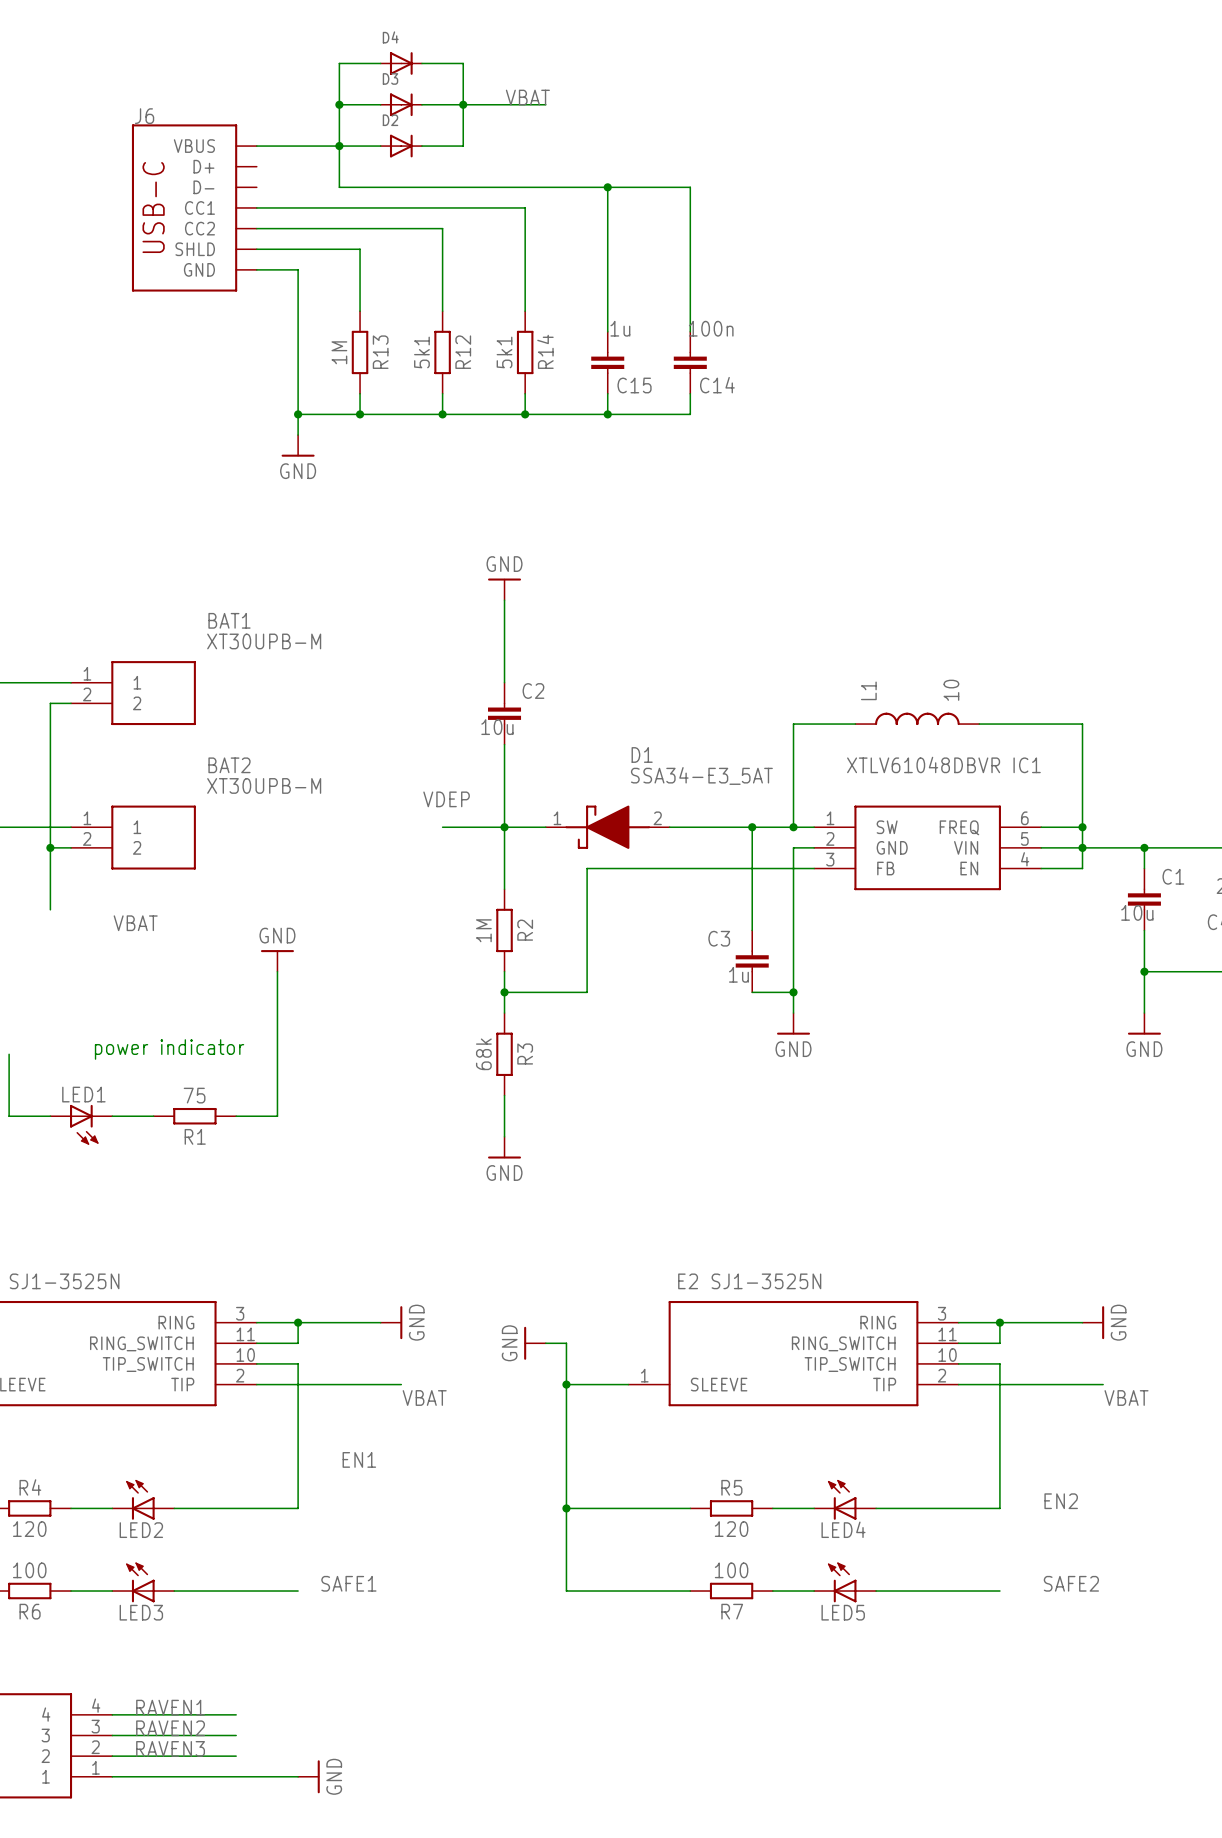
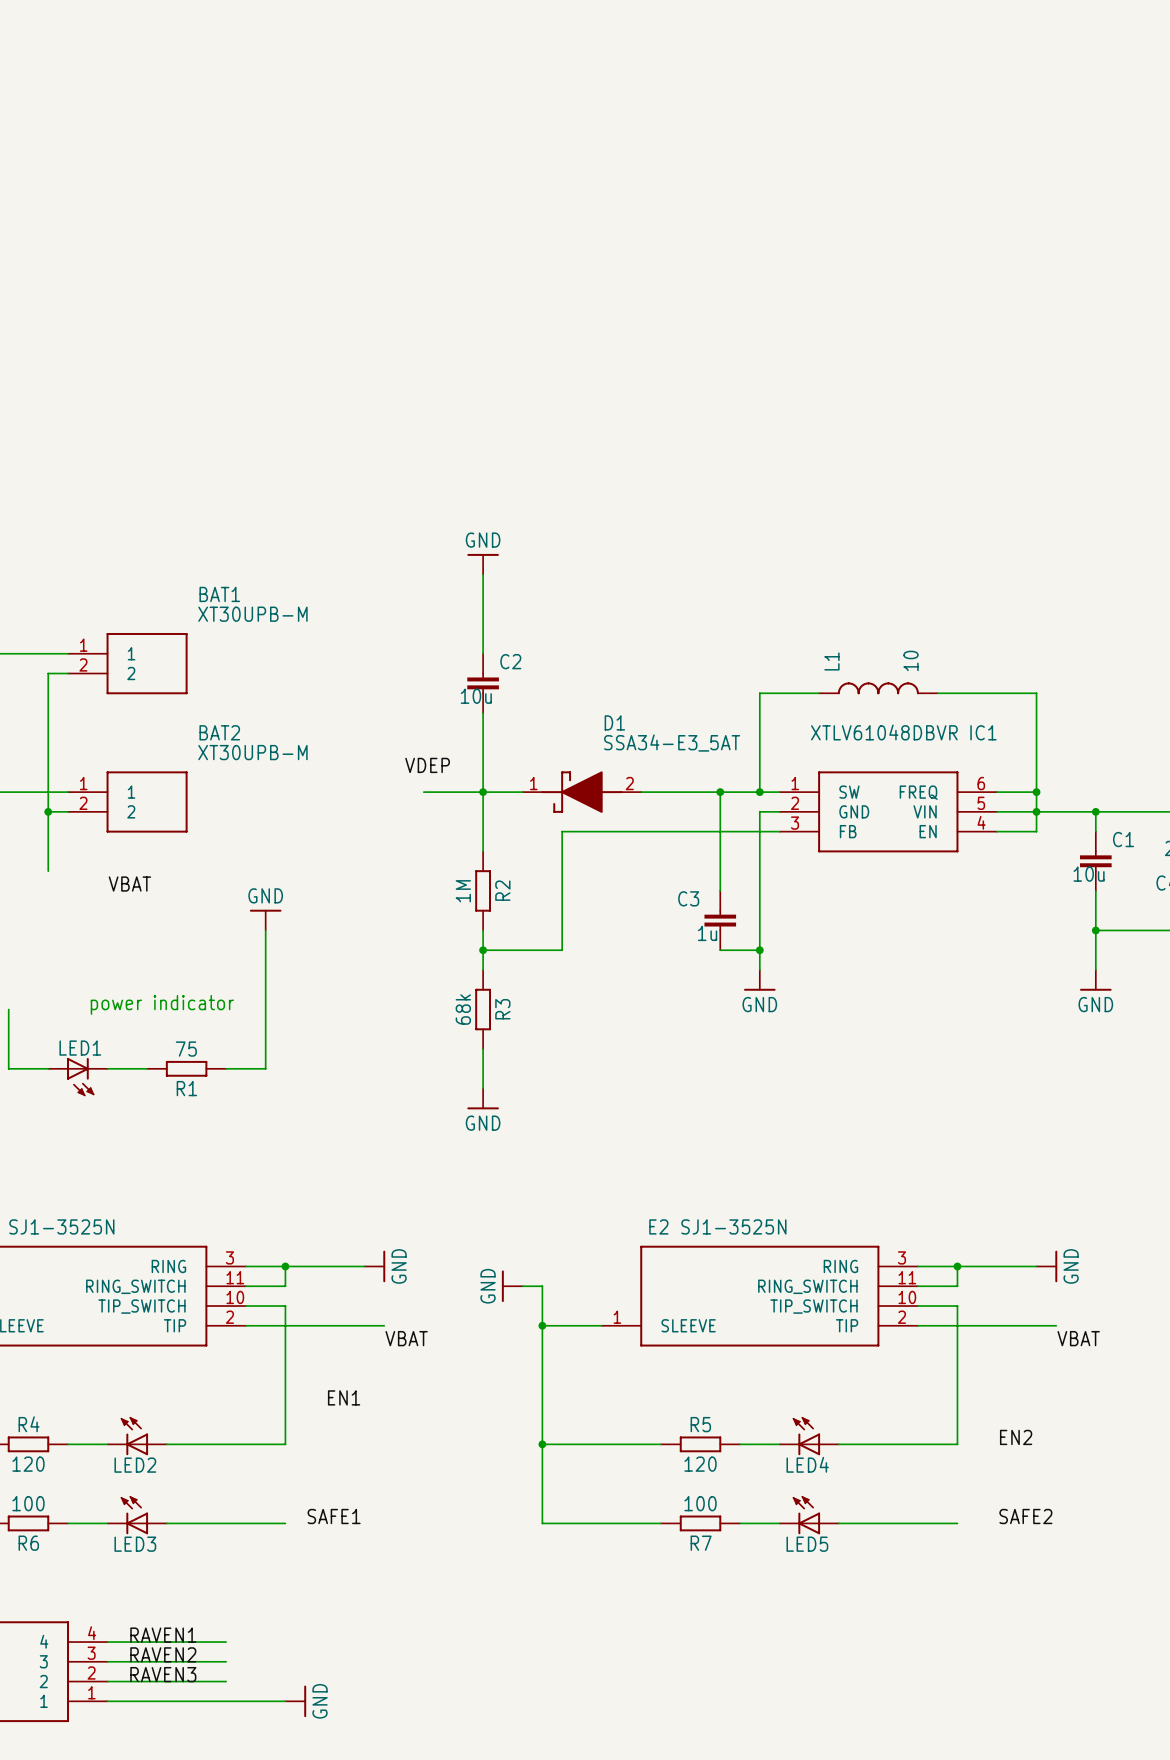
wire: (380, 63) (339, 63) (339, 187) (690, 187) (690, 331) -> none
D4: (401, 63) -> none
wire: (421, 63) (463, 63) (463, 146) (421, 146) -> none
label: VBAT (527, 97) -> none
wire: (339, 104) (380, 104) -> none
junction: (339, 104) -> none
D3: (401, 104) -> none
wire: (421, 104) (545, 104) -> none
junction: (463, 104) -> none
wire: (256, 146) (380, 146) -> none
junction: (339, 146) -> none
D2: (401, 146) -> none
wire: (607, 187) (607, 331) -> none
junction: (607, 187) -> none
J6: (194, 207) -> none
wire: (256, 207) (525, 207) (525, 311) -> none
wire: (256, 228) (442, 228) (442, 311) -> none
wire: (256, 249) (360, 249) (360, 311) -> none
wire: (256, 269) (298, 269) (298, 435) -> none
R13: 1M (360, 352) -> none
R12: 5k1 (442, 352) -> none
R14: 5k1 (525, 352) -> none
C15: 1u (607, 362) -> none
C14: 100n (690, 362) -> none
wire: (360, 393) (360, 414) -> none
wire: (442, 393) (442, 414) -> none
wire: (525, 393) (525, 414) -> none
wire: (607, 393) (607, 414) -> none
wire: (690, 393) (690, 414) (298, 414) -> none
junction: (298, 414) -> none
junction: (360, 414) -> none
junction: (442, 414) -> none
junction: (525, 414) -> none
junction: (607, 414) -> none
power symbol: GND (298, 445) -> none

